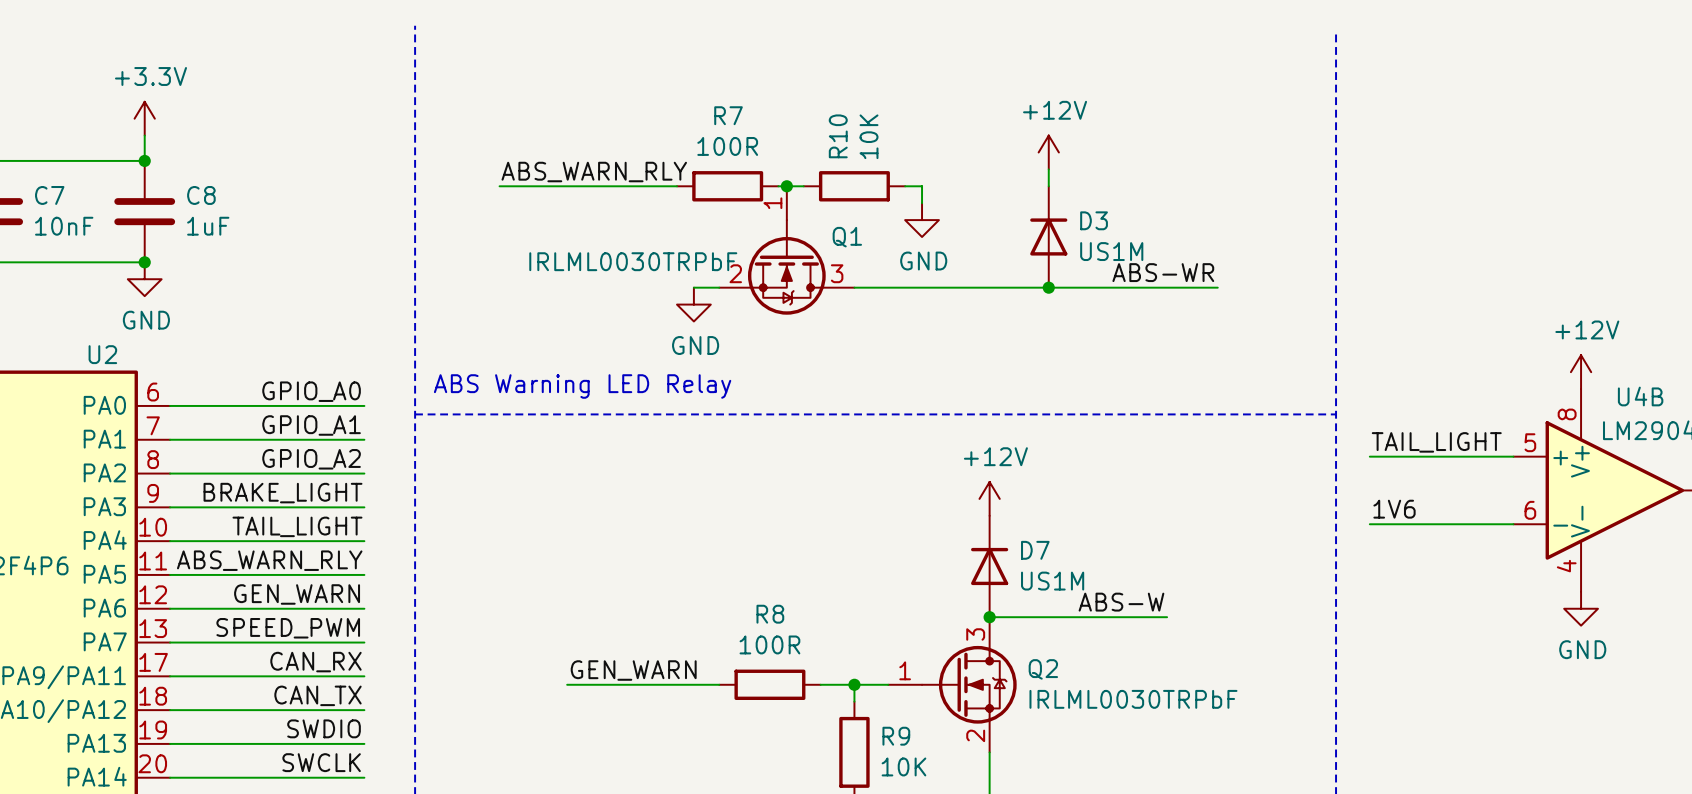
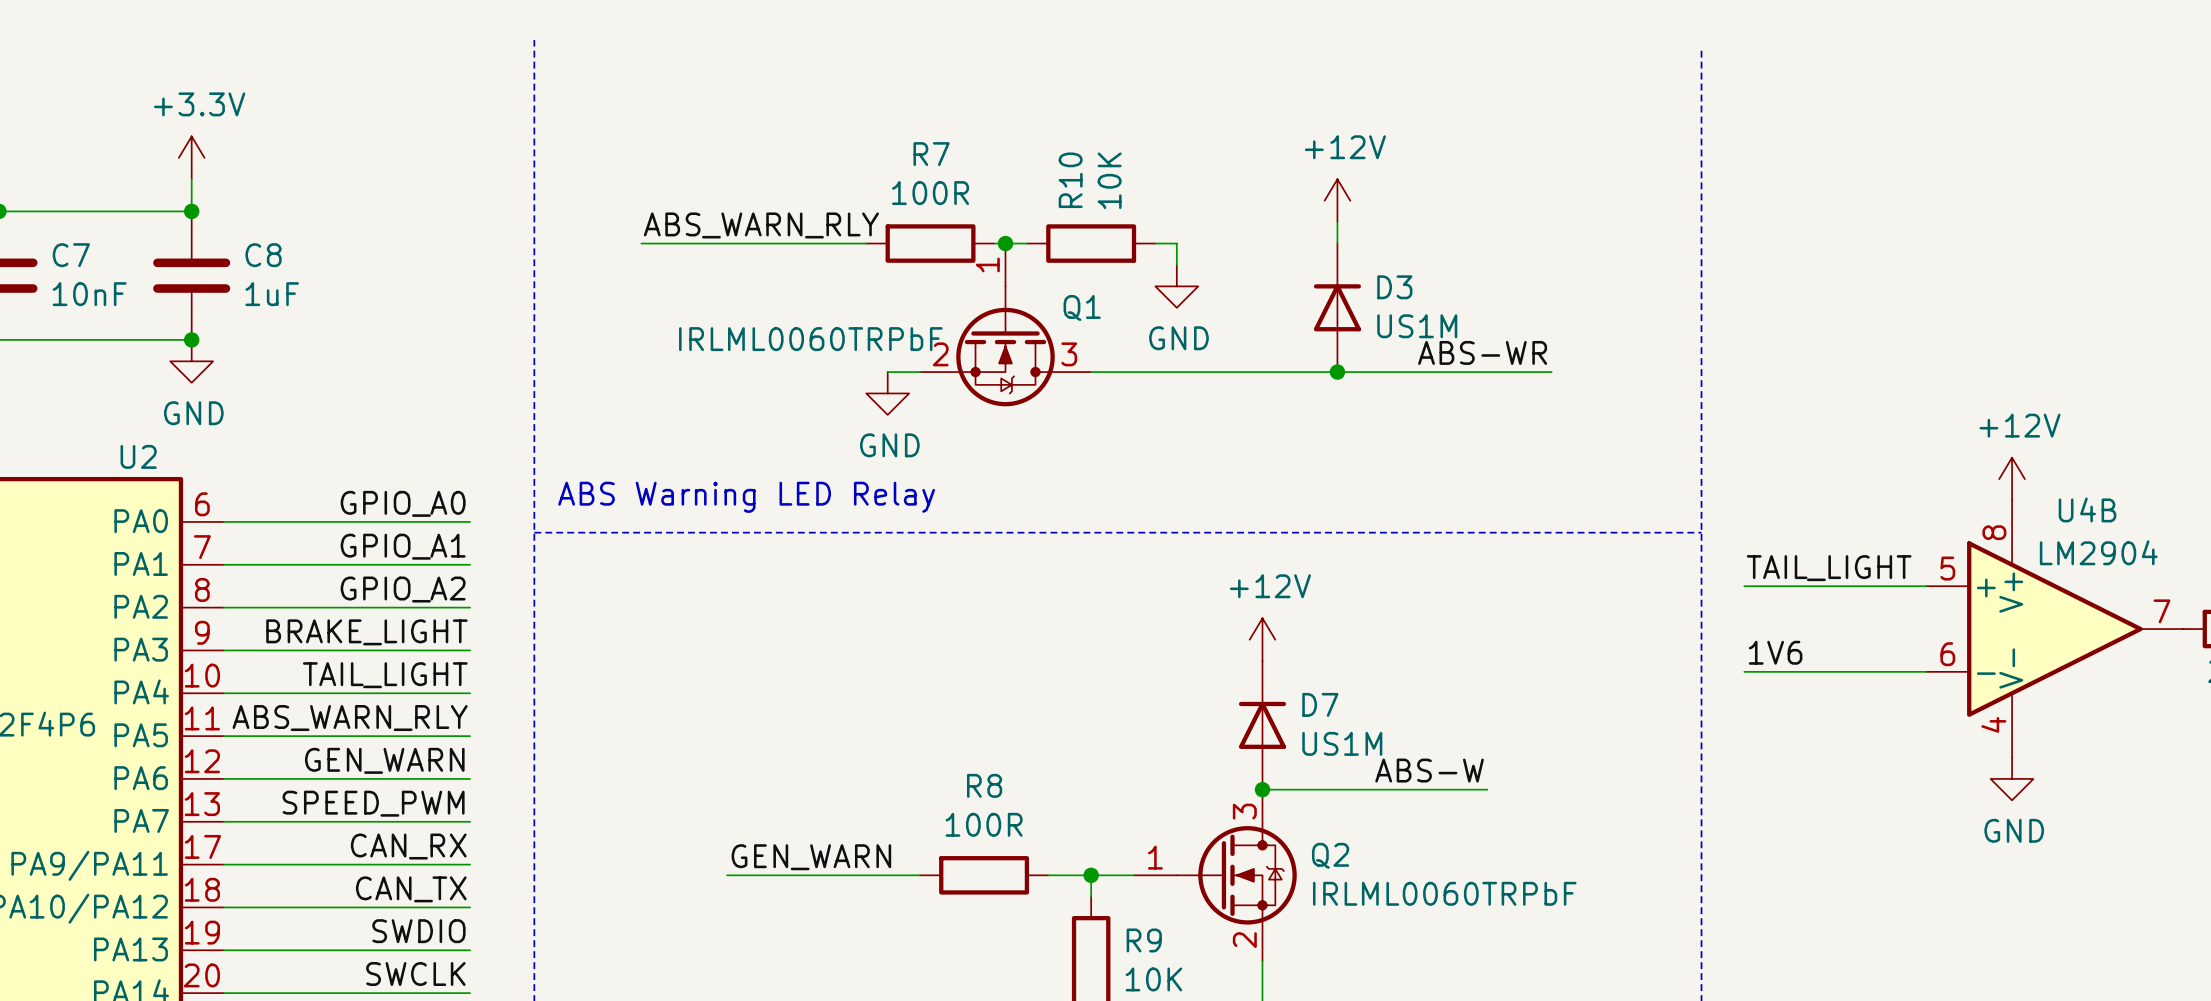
Q1 value: IRLML0030TRPbF (633, 261) -> IRLML0060TRPbF (810, 339)
Q2 value: IRLML0030TRPbF (1133, 699) -> IRLML0060TRPbF (1444, 893)

